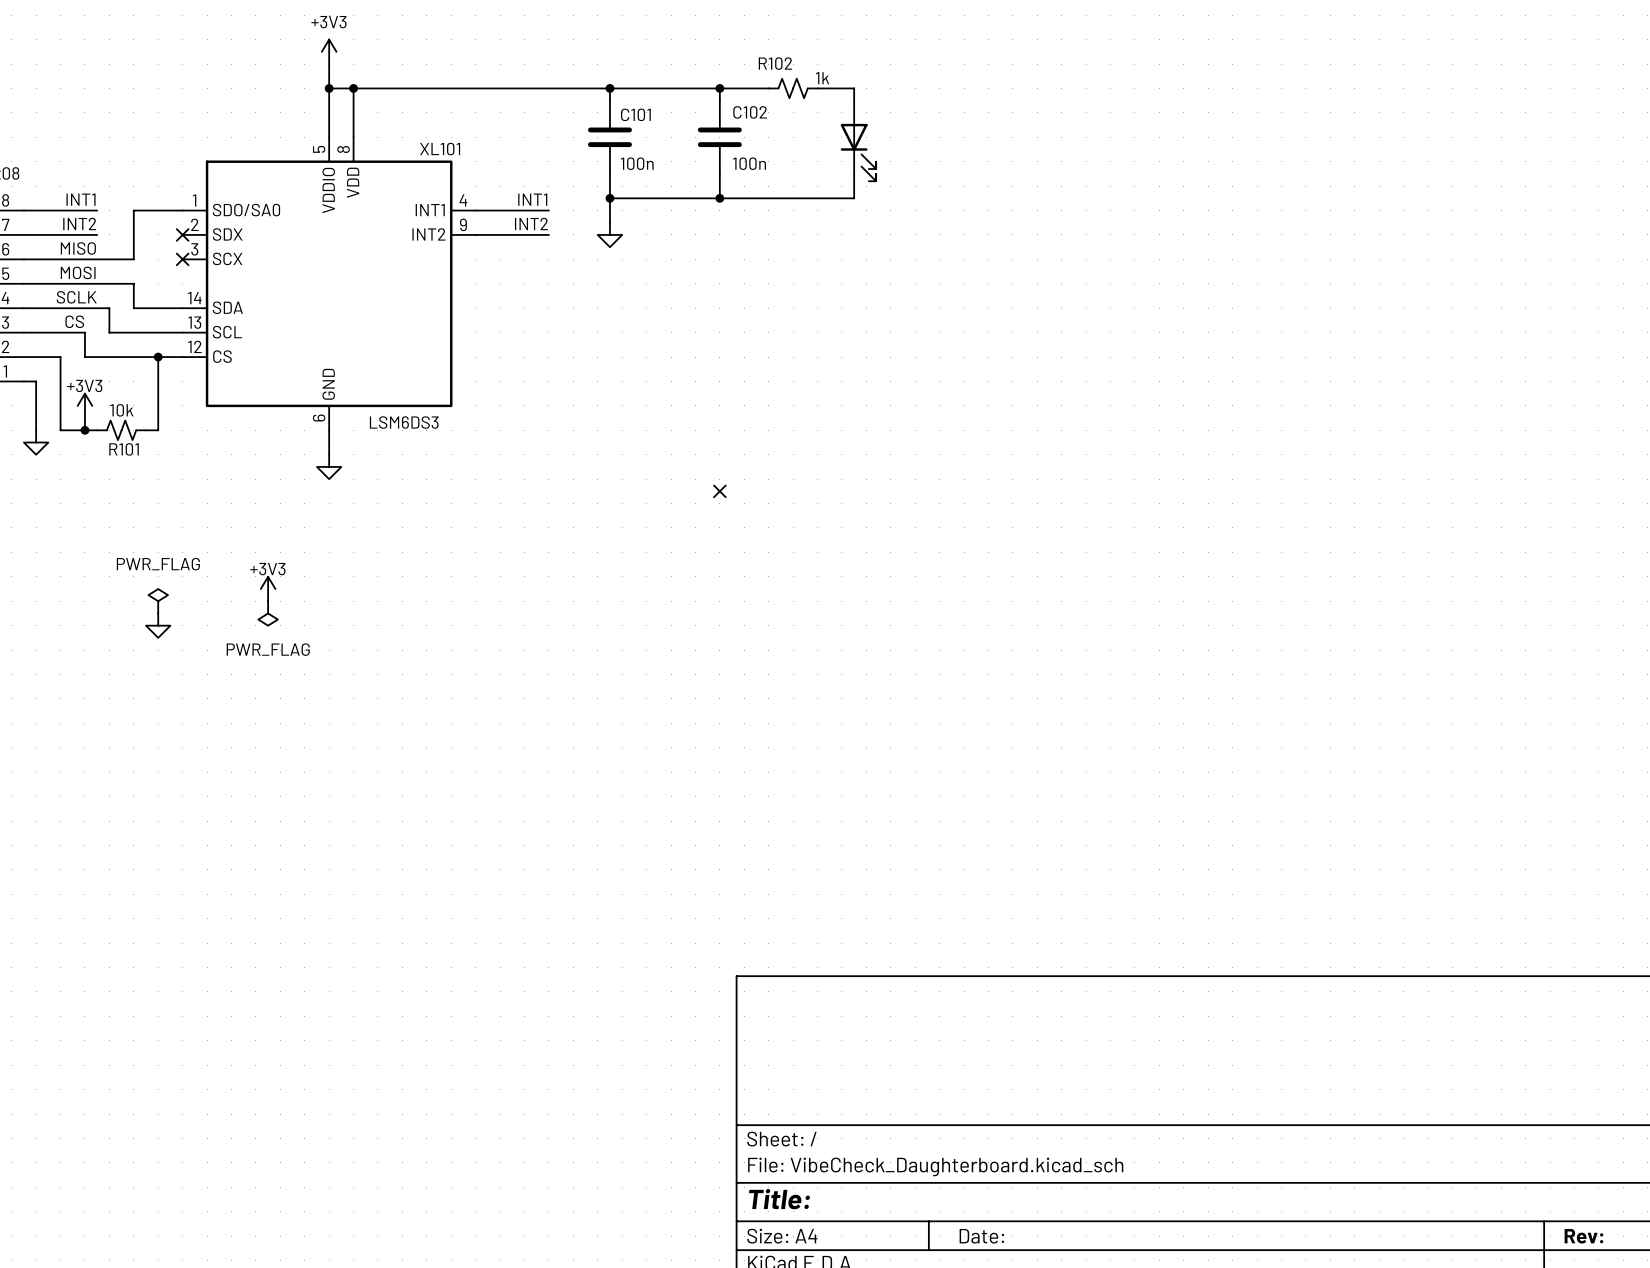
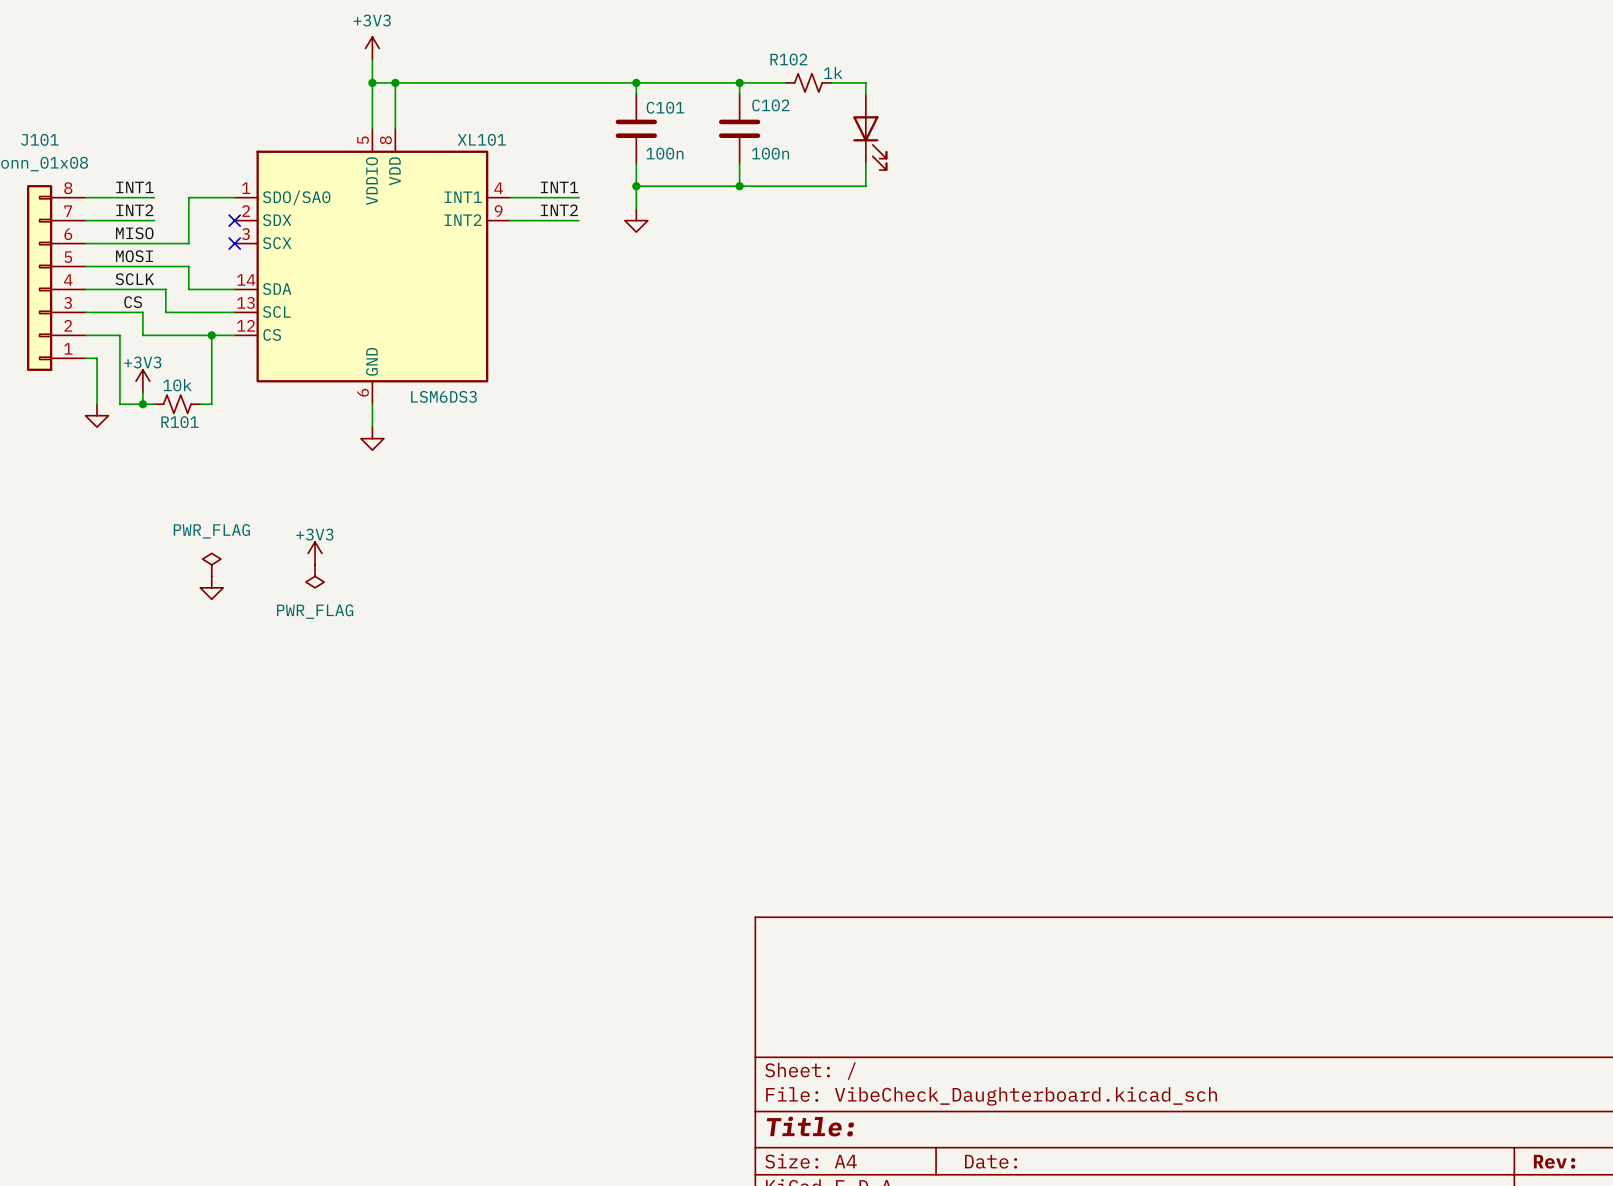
no-connect mark: (719, 491) -> none

